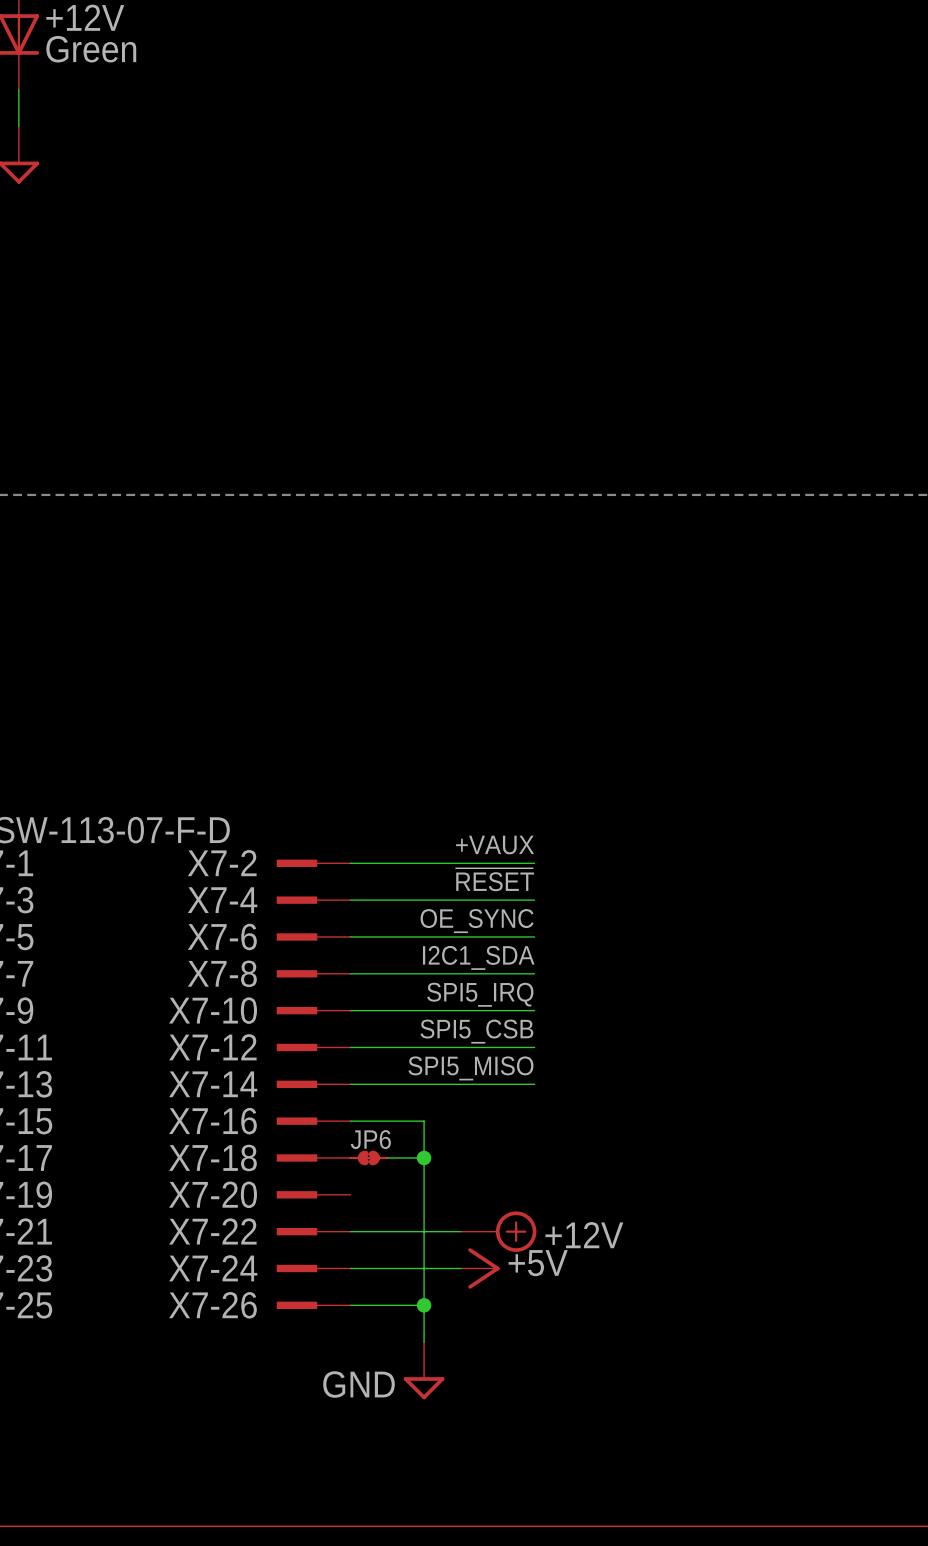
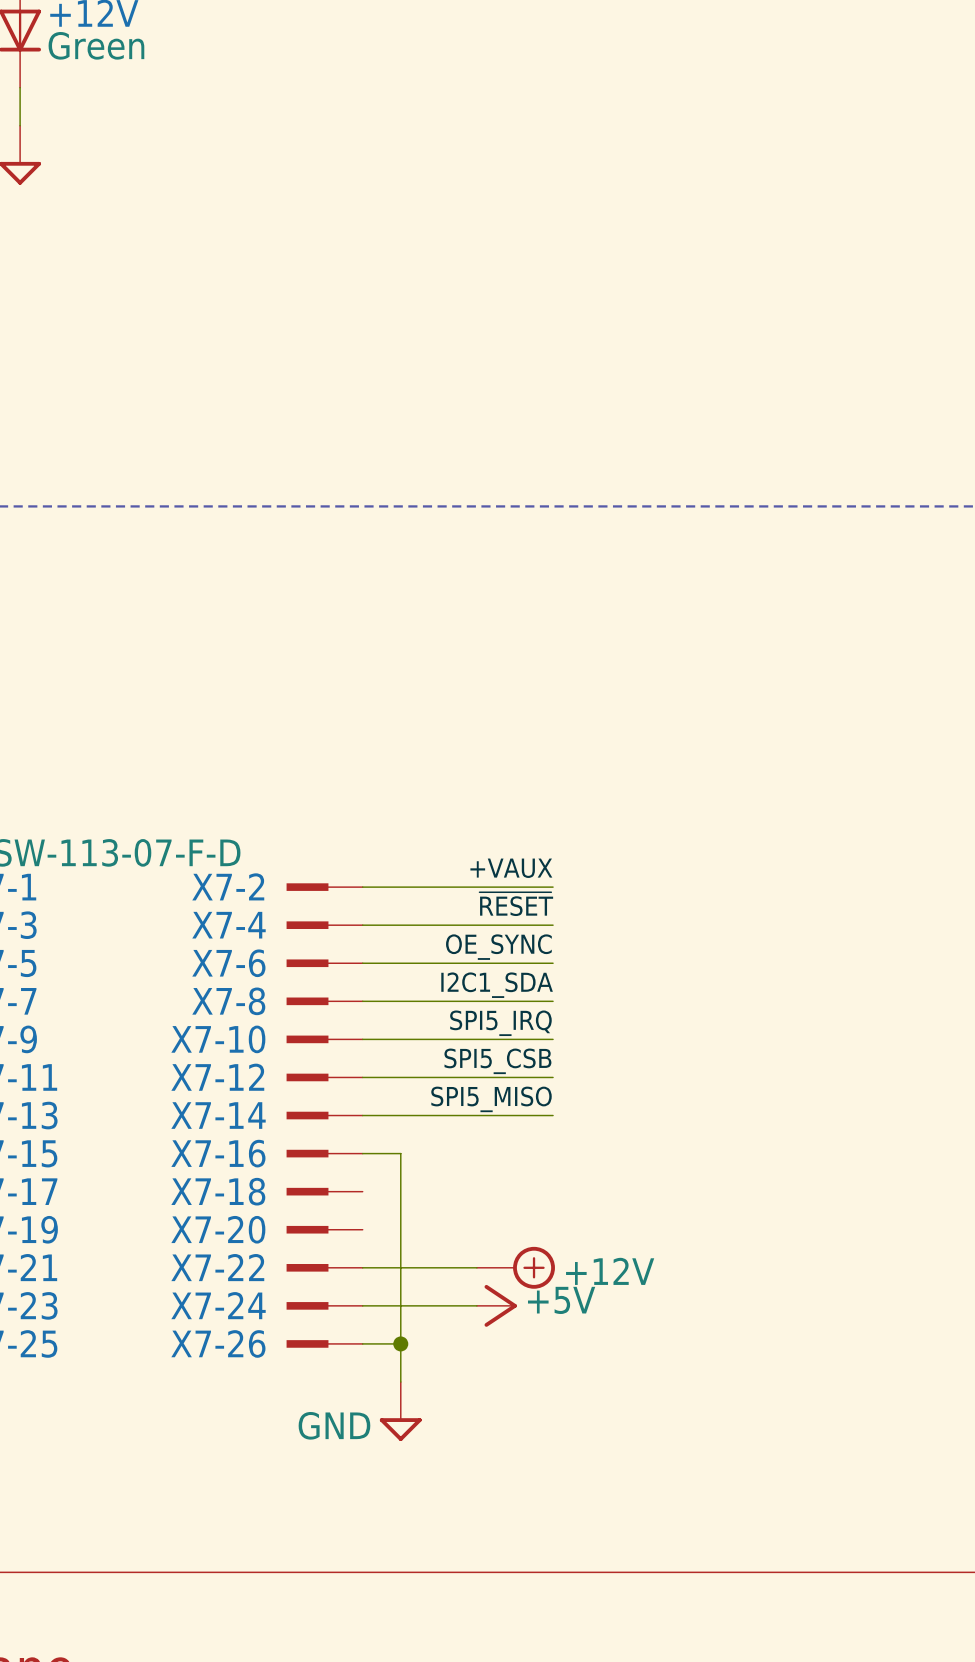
wire: (387, 1121) (424, 1121) (424, 1342) -> (400, 1153) (400, 1382)
JP6: (368, 1157) -> none
wire: (387, 1157) (424, 1157) -> none
junction: (424, 1157) -> none
wire: (387, 1305) (424, 1305) -> none
junction position: (424, 1305) -> (400, 1343)
power symbol position: GND (424, 1370) -> GND (400, 1411)

